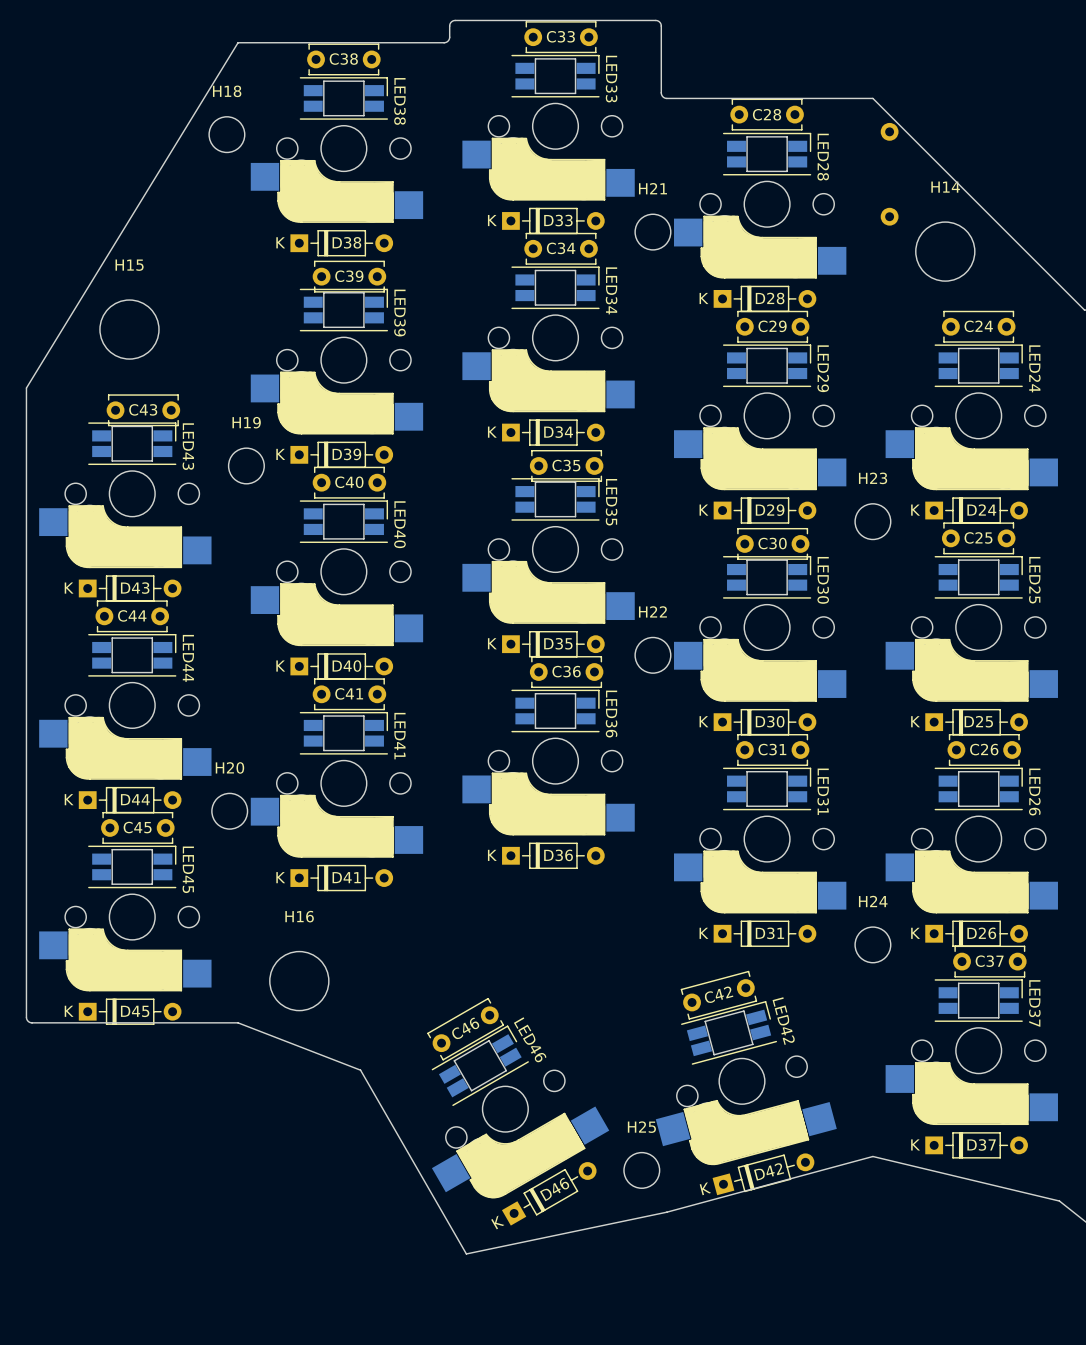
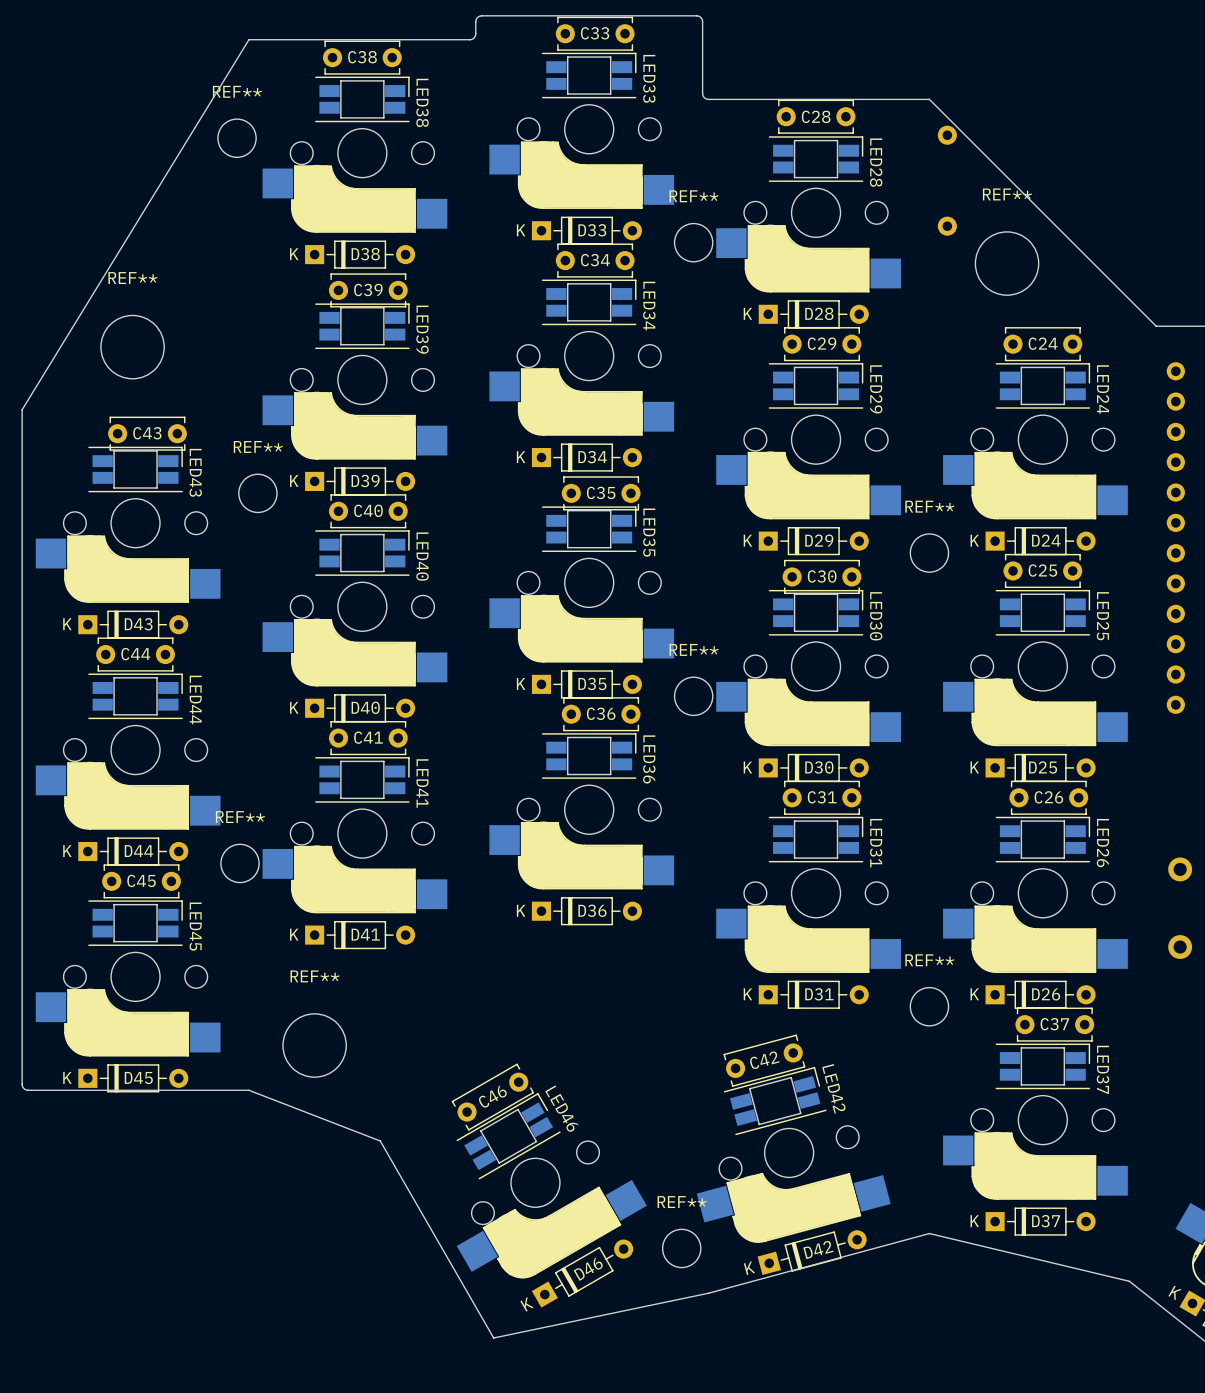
H18 name: H18 (227, 91) -> REF** (237, 91)
H14 name: H14 (945, 187) -> REF** (1007, 194)
H21 name: H21 (652, 188) -> REF** (694, 196)
H15 name: H15 (129, 265) -> REF** (132, 278)
H19 name: H19 (246, 422) -> REF** (258, 446)
H23 name: H23 (873, 478) -> REF** (929, 506)
H22 name: H22 (652, 611) -> REF** (694, 649)
H20 name: H20 (229, 767) -> REF** (240, 817)
H24 name: H24 (873, 901) -> REF** (929, 960)
H16 name: H16 (299, 916) -> REF** (315, 976)
H25 name: H25 (641, 1127) -> REF** (682, 1202)

